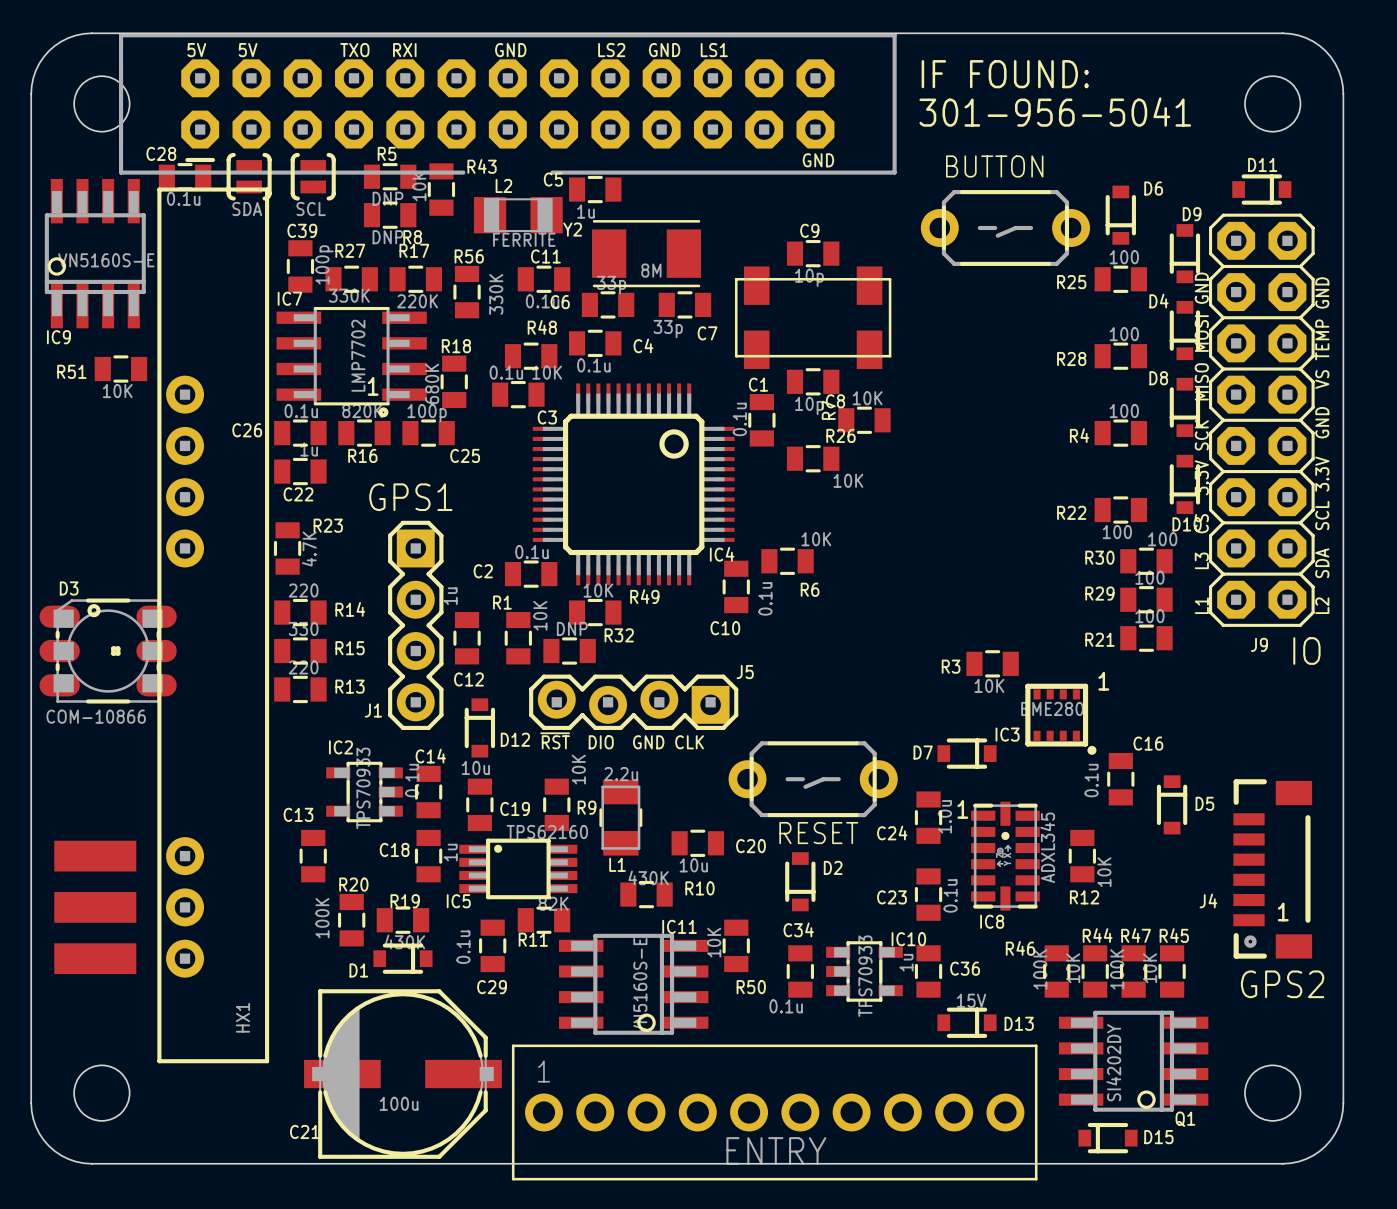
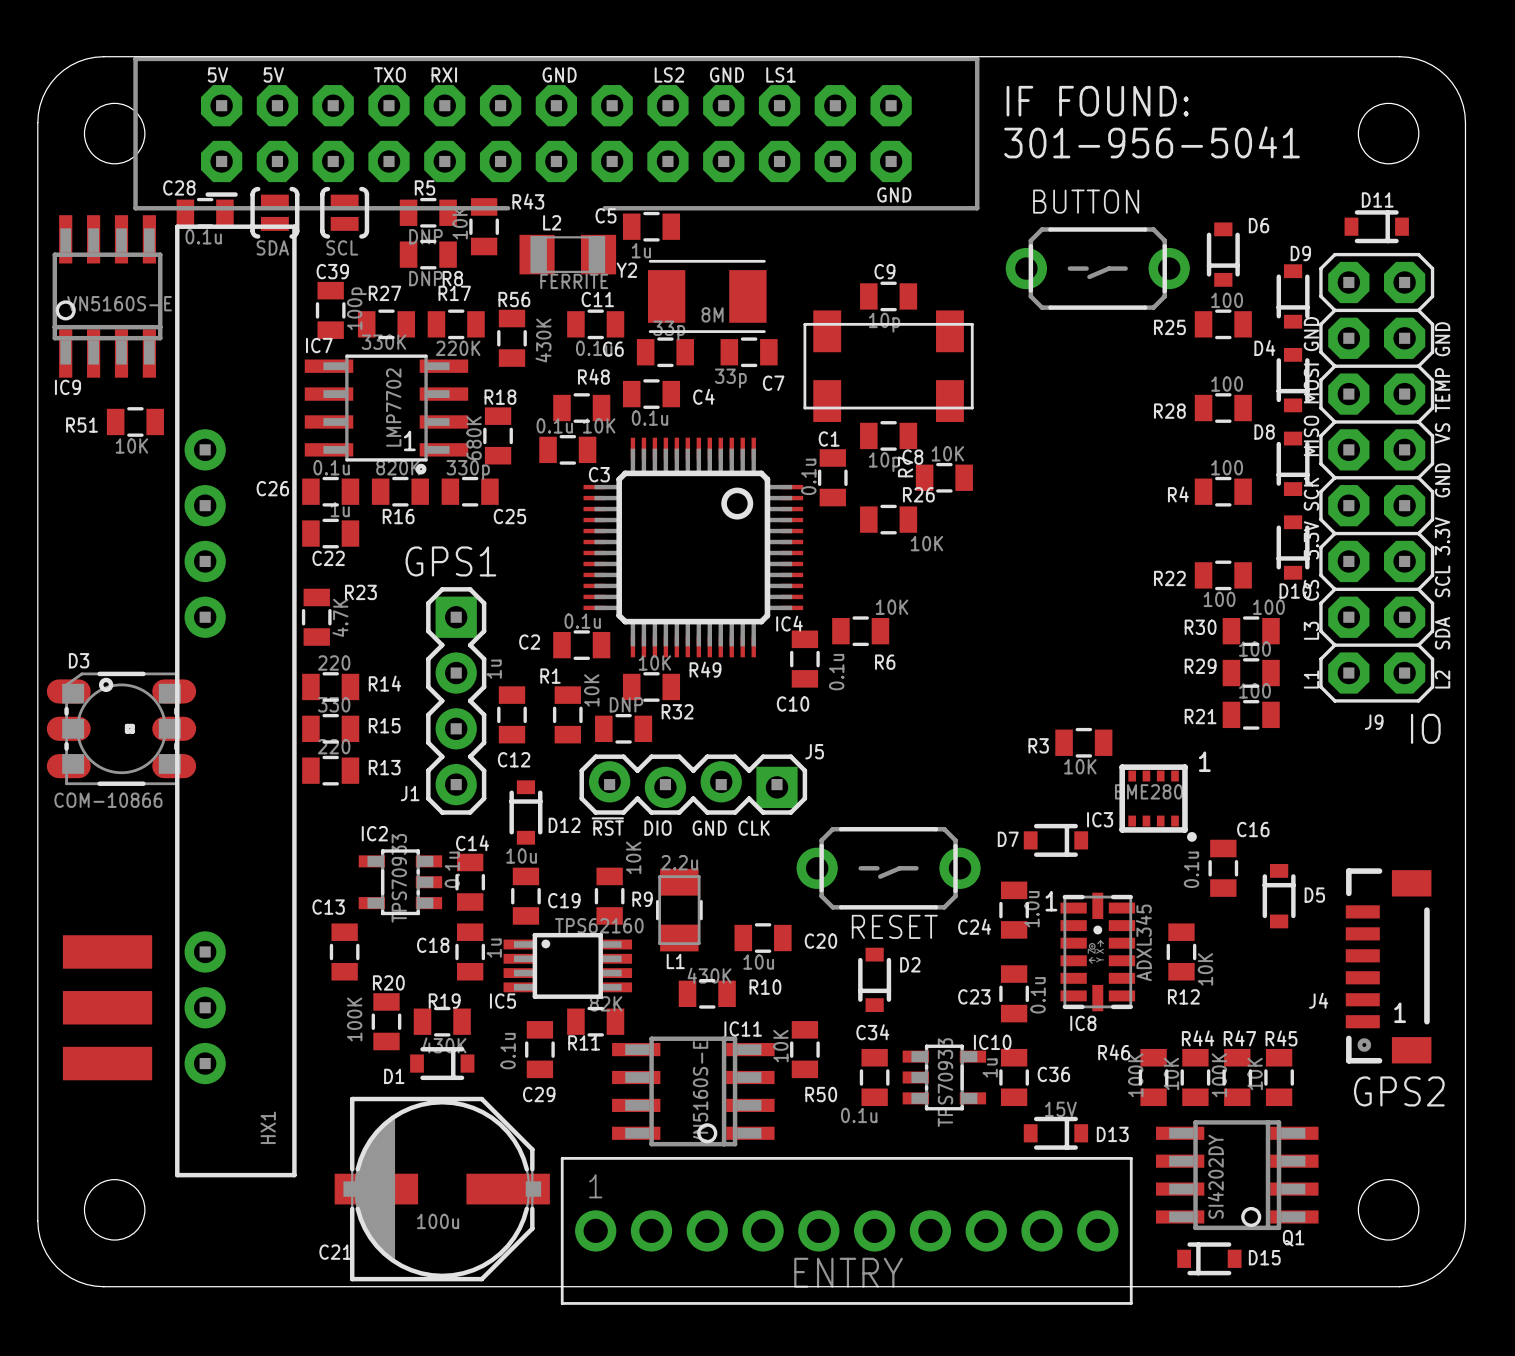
R56 value: 330K (496, 294) -> 430K (543, 340)
C25 value: 100p (427, 413) -> 330p (468, 469)

